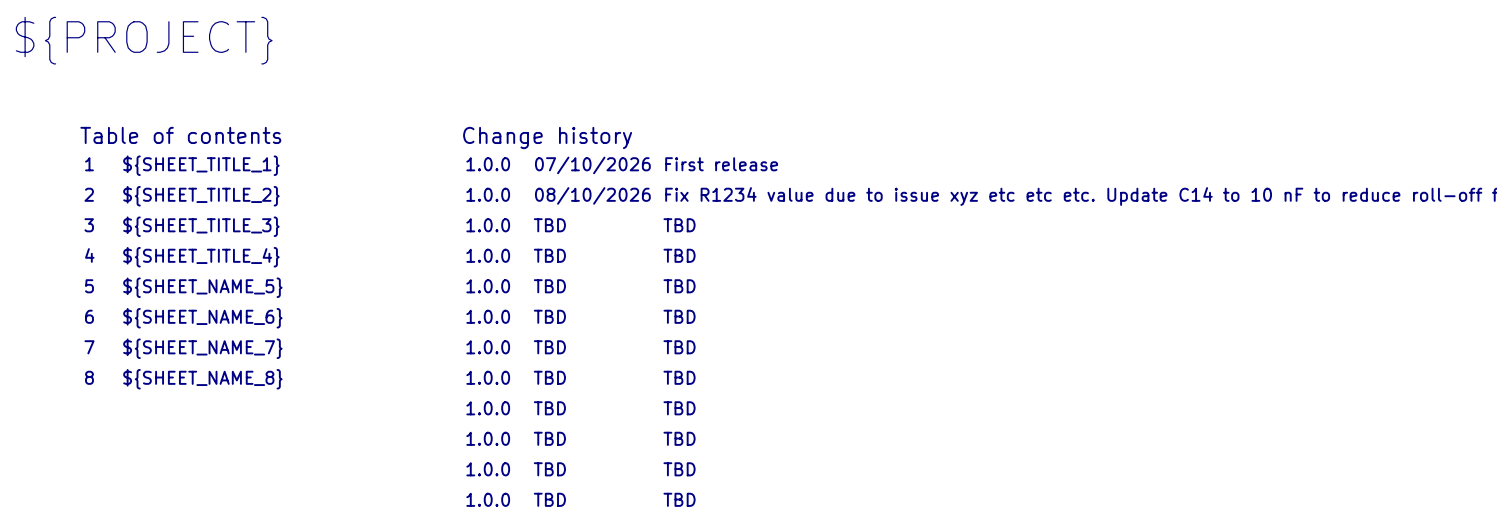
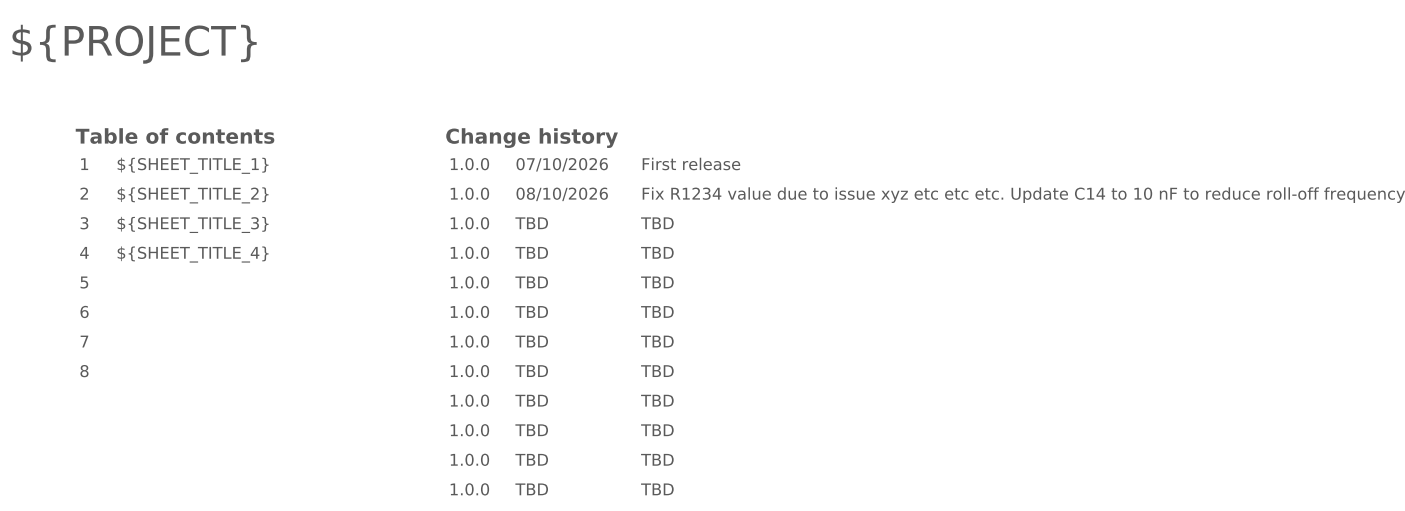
text: ${SHEET_NAME_5} (202, 287) -> none
text: ${SHEET_NAME_6} (202, 318) -> none
text: ${SHEET_NAME_7} (202, 348) -> none
text: ${SHEET_NAME_8} (202, 379) -> none

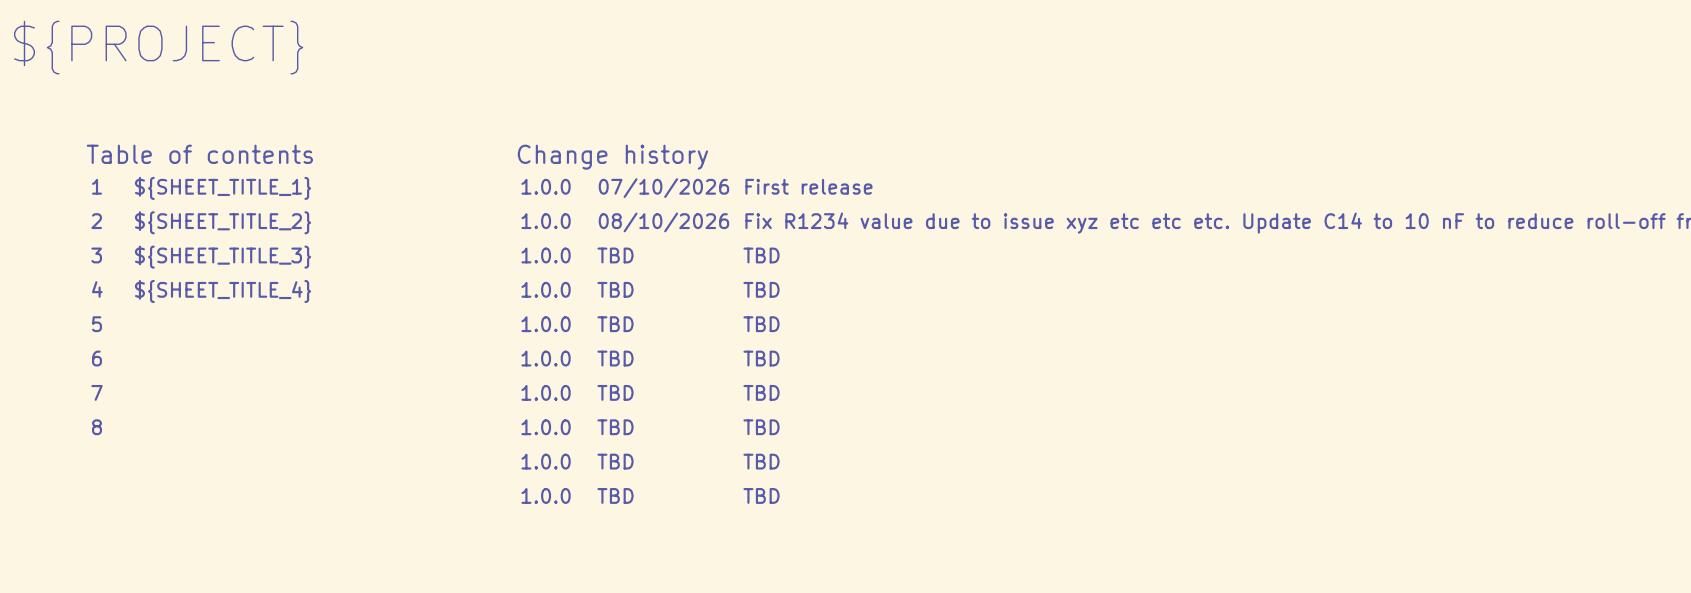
text: 1.0.0 (469, 459) -> none
text: TBD (531, 459) -> none
text: TBD (657, 459) -> none
text: 1.0.0 (469, 489) -> none
text: TBD (531, 489) -> none
text: TBD (657, 489) -> none

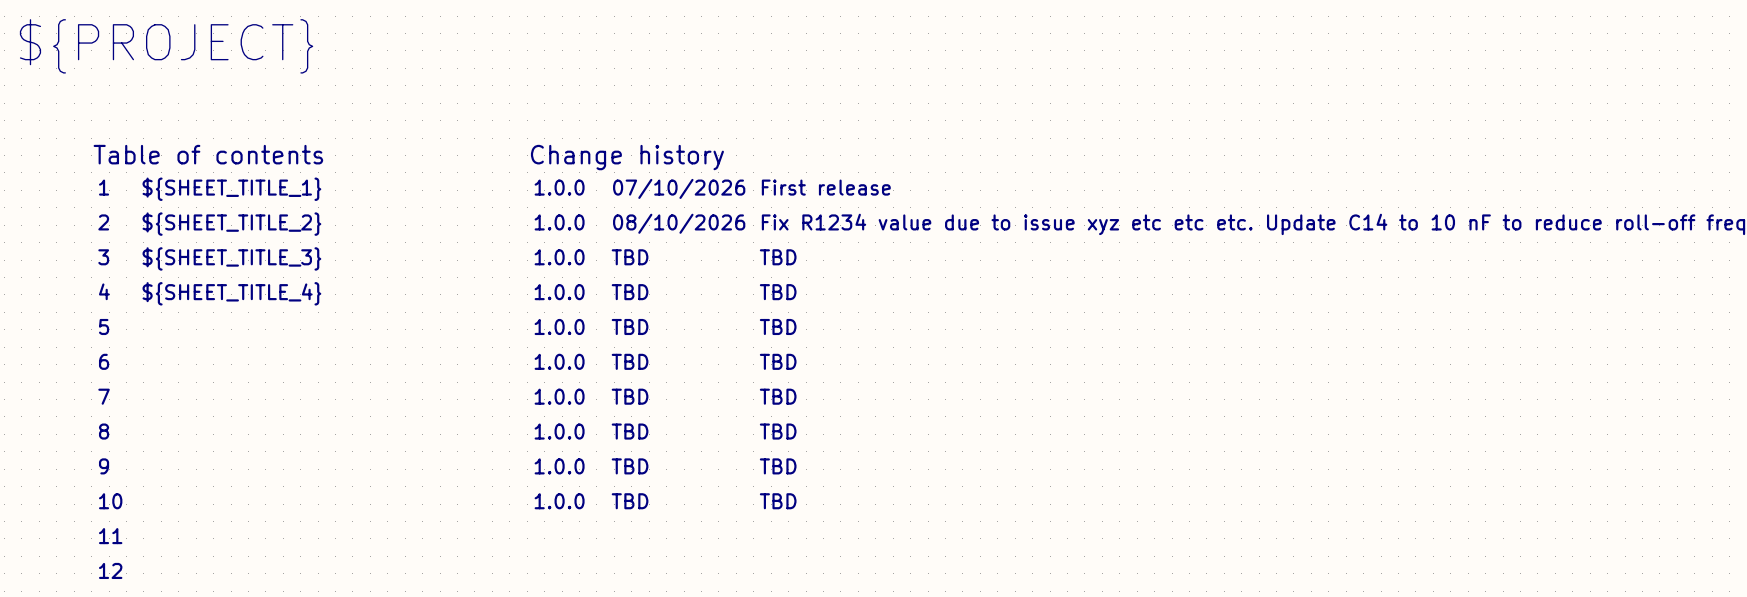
text: none -> 9 (104, 466)
text: none -> 10 (110, 501)
text: none -> 11 (110, 536)
text: none -> 12 (110, 570)

